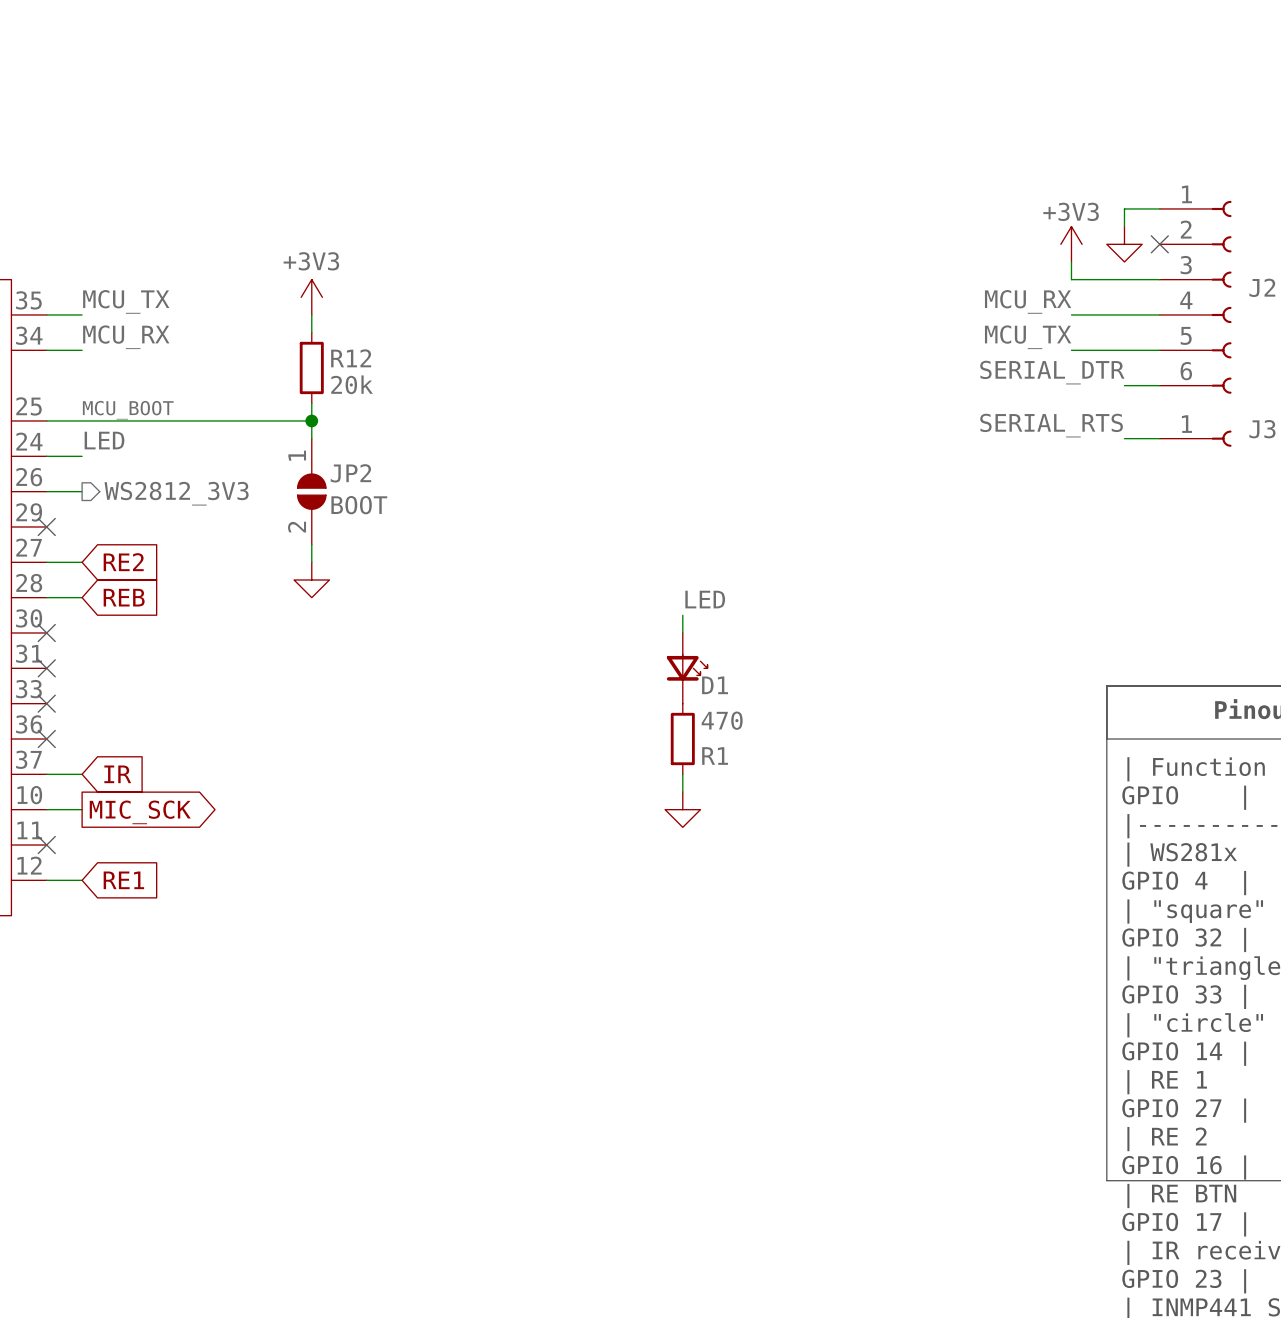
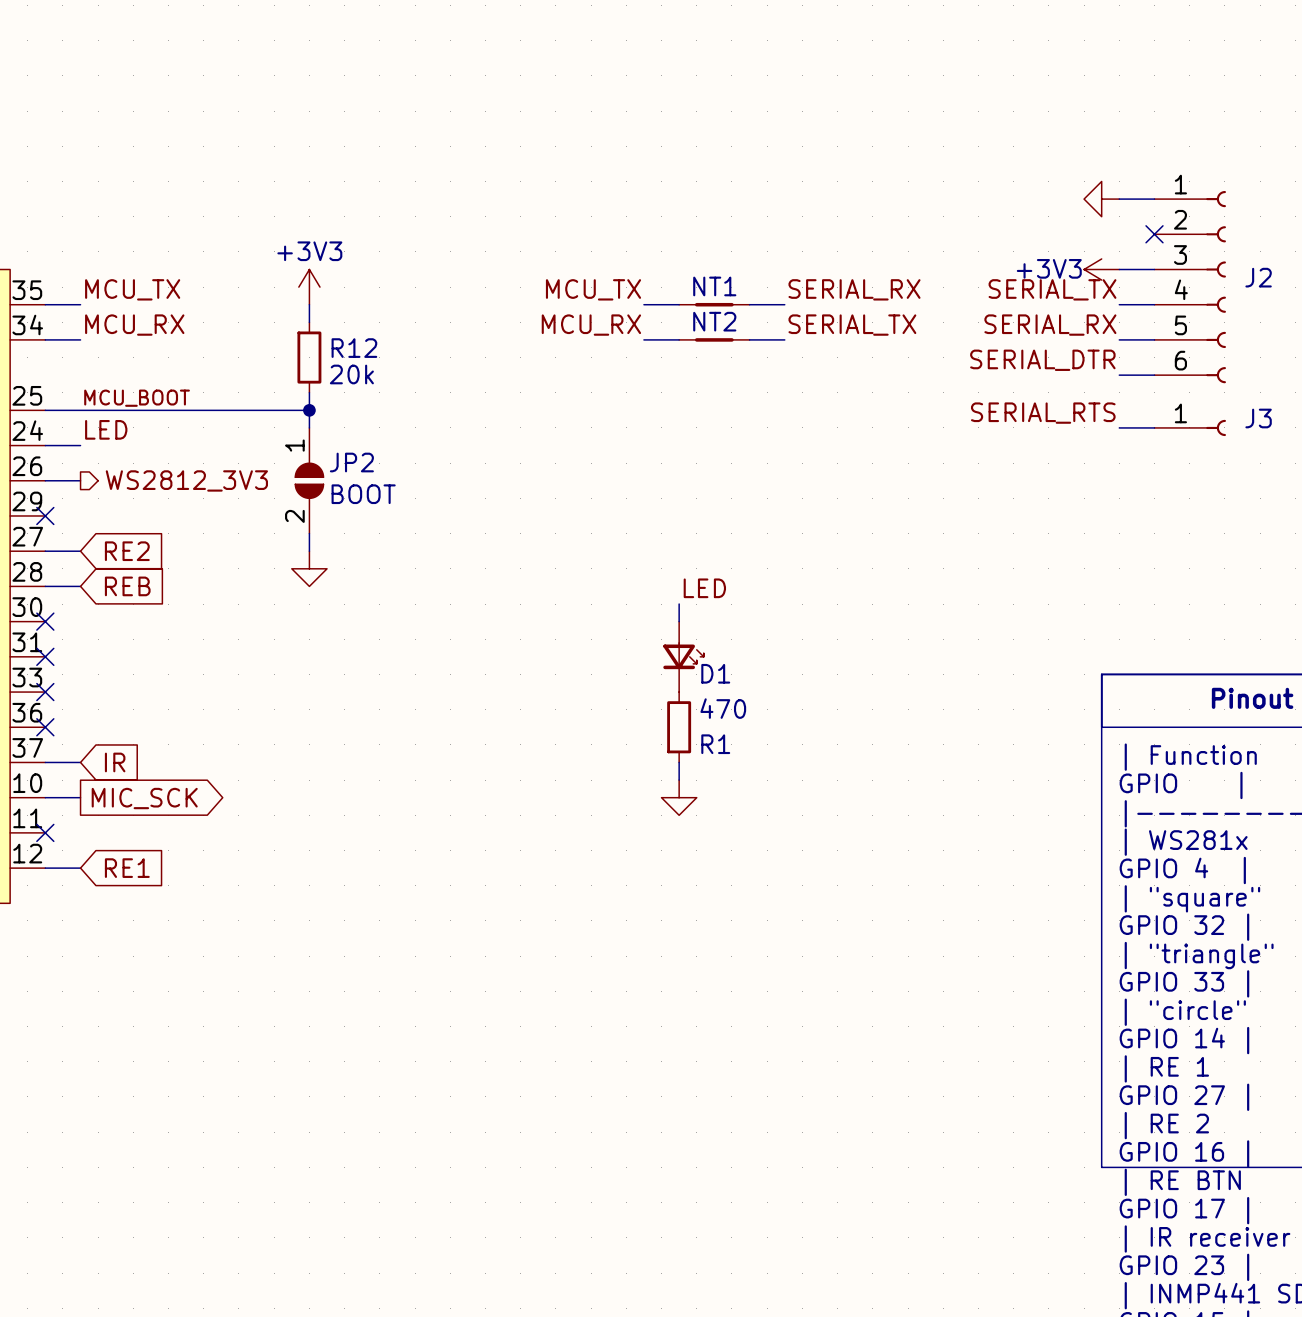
wire: (1124, 208) (1124, 226) -> none
power symbol rotation: 0° (1071, 244) -> 90° counterclockwise (1101, 269)
power symbol position: +3V3 (1071, 244) -> +3V3 (1101, 269)
power symbol rotation: 0° (1124, 244) -> 90° clockwise (1101, 199)
power symbol position: (1124, 244) -> (1101, 199)
wire: (1071, 261) (1071, 279) (1124, 279) -> none
label: none -> MCU_TX (593, 289)
label: none -> SERIAL_RX (854, 289)
label: MCU_RX (1028, 301) -> none
label: none -> SERIAL_TX (1052, 289)
wire: none -> (643, 304) (679, 304)
NT1: none -> (714, 304)
wire: none -> (749, 304) (784, 304)
wire: (1071, 314) (1124, 314) -> none
label: none -> MCU_RX (591, 325)
label: none -> SERIAL_TX (852, 325)
label: MCU_TX (1028, 337) -> none
label: none -> SERIAL_RX (1050, 325)
wire: none -> (643, 339) (679, 339)
NT2: none -> (714, 339)
wire: none -> (749, 339) (784, 339)
wire: (1071, 350) (1124, 350) -> none

